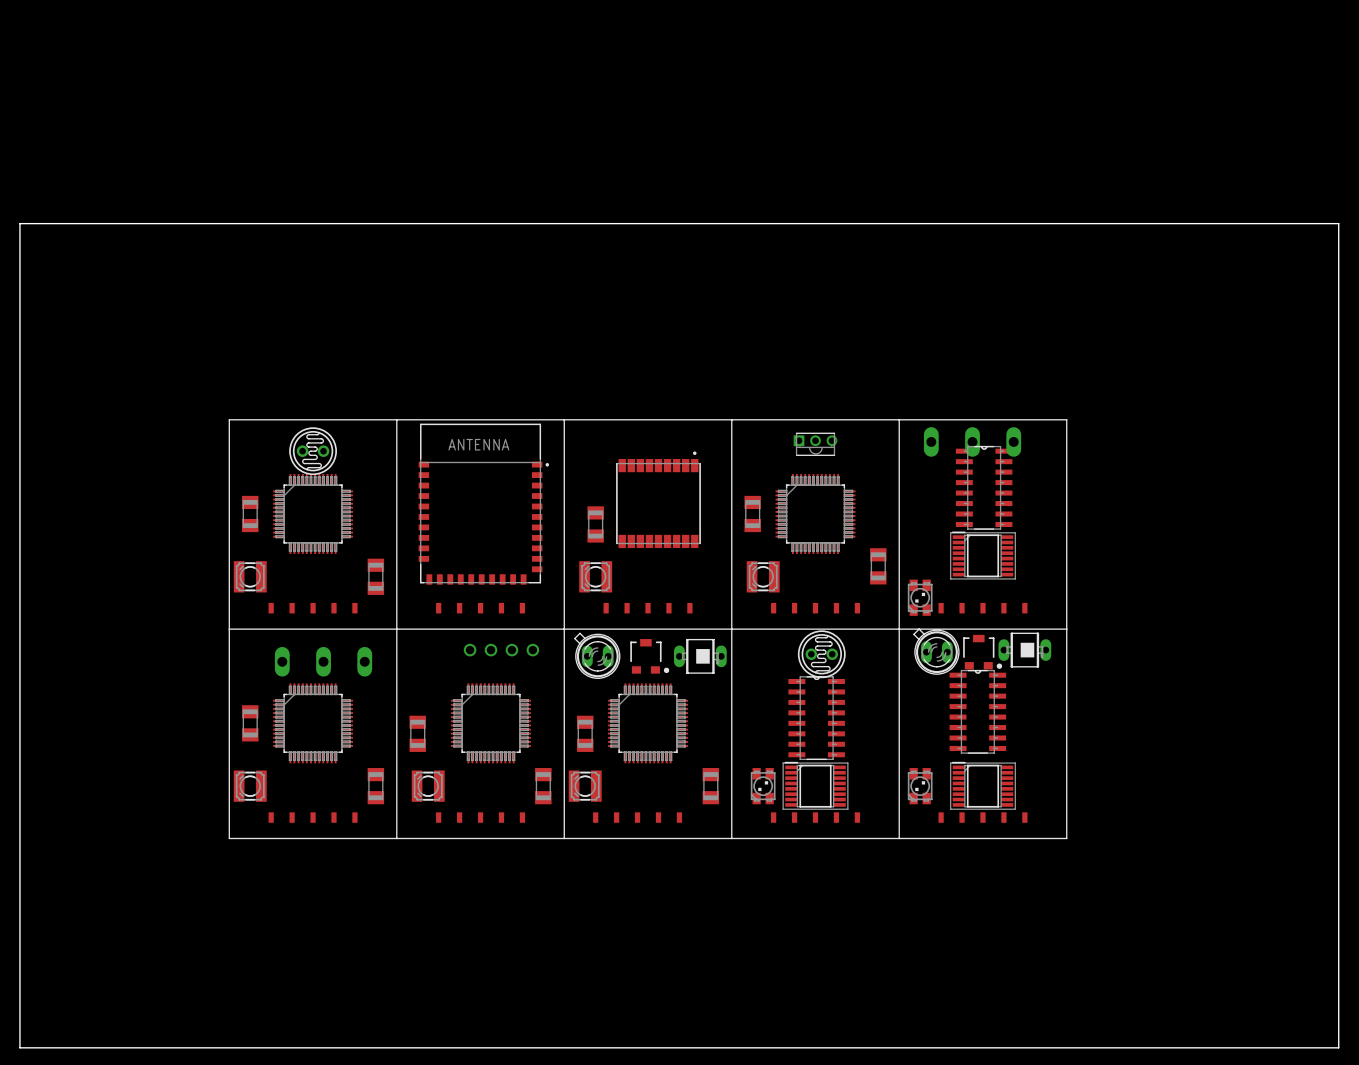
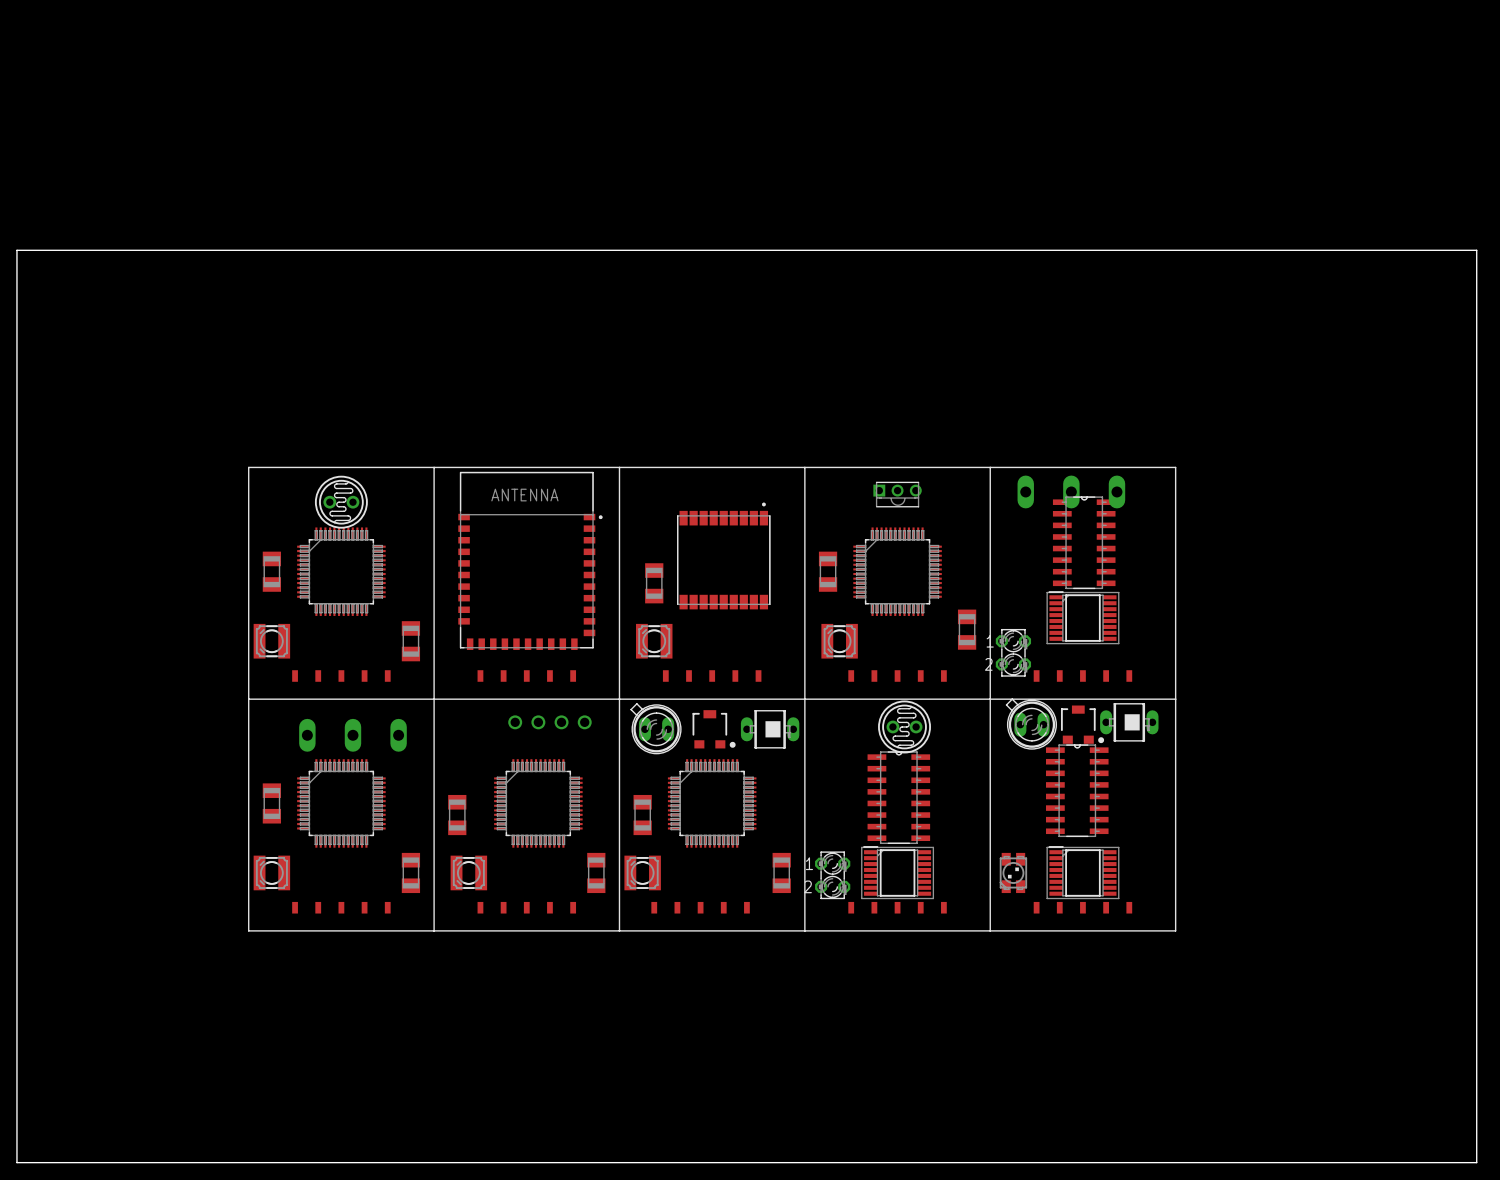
part: none -> (1013, 652)
part: (920, 597) -> none
part footprint: [750, 768, 776, 805] -> [815, 851, 851, 900]

